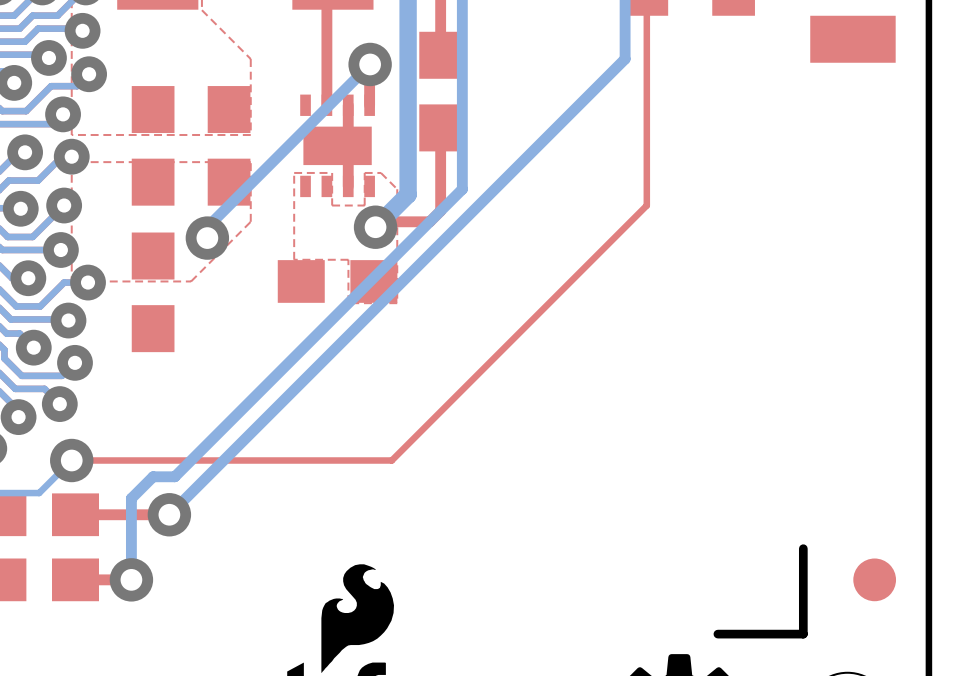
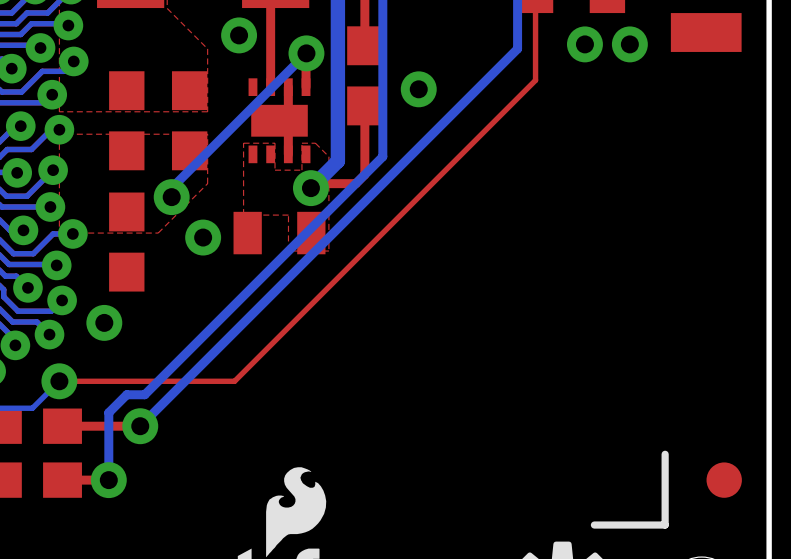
via: none -> (239, 35)
via: none -> (584, 44)
via: none -> (629, 44)
top track: (646, 97) (646, 205) (391, 460) (283, 460) -> (535, 80) (234, 381)
via: none -> (418, 89)
part footprint: [277, 260, 398, 303] -> [233, 211, 326, 255]
via: none -> (203, 237)
via: none -> (104, 322)

